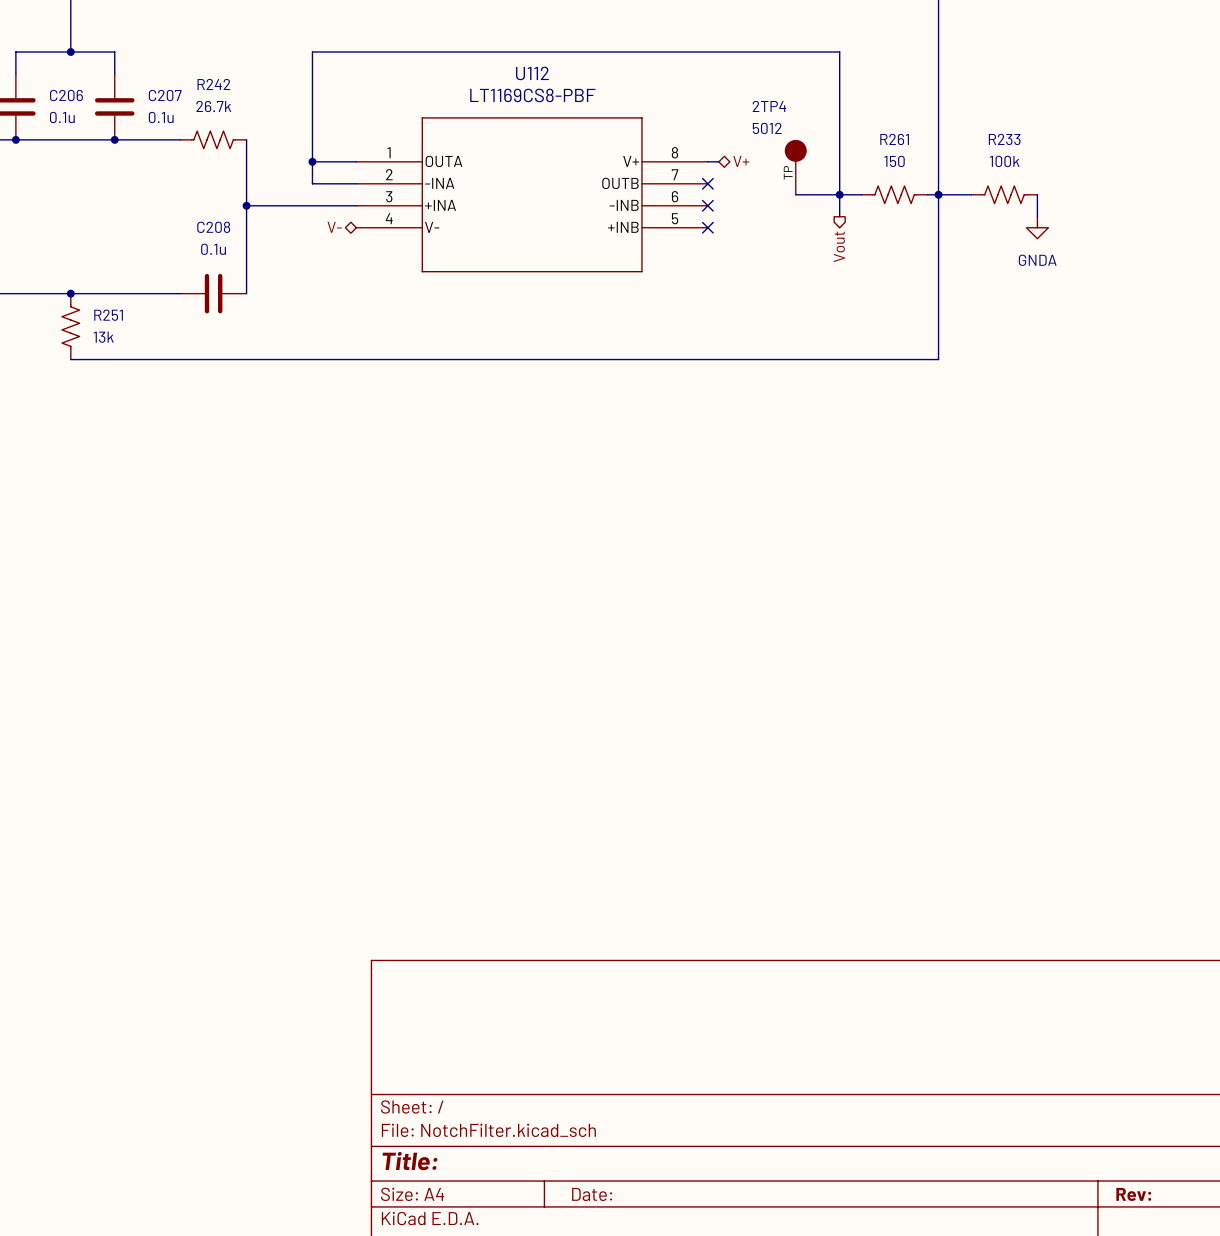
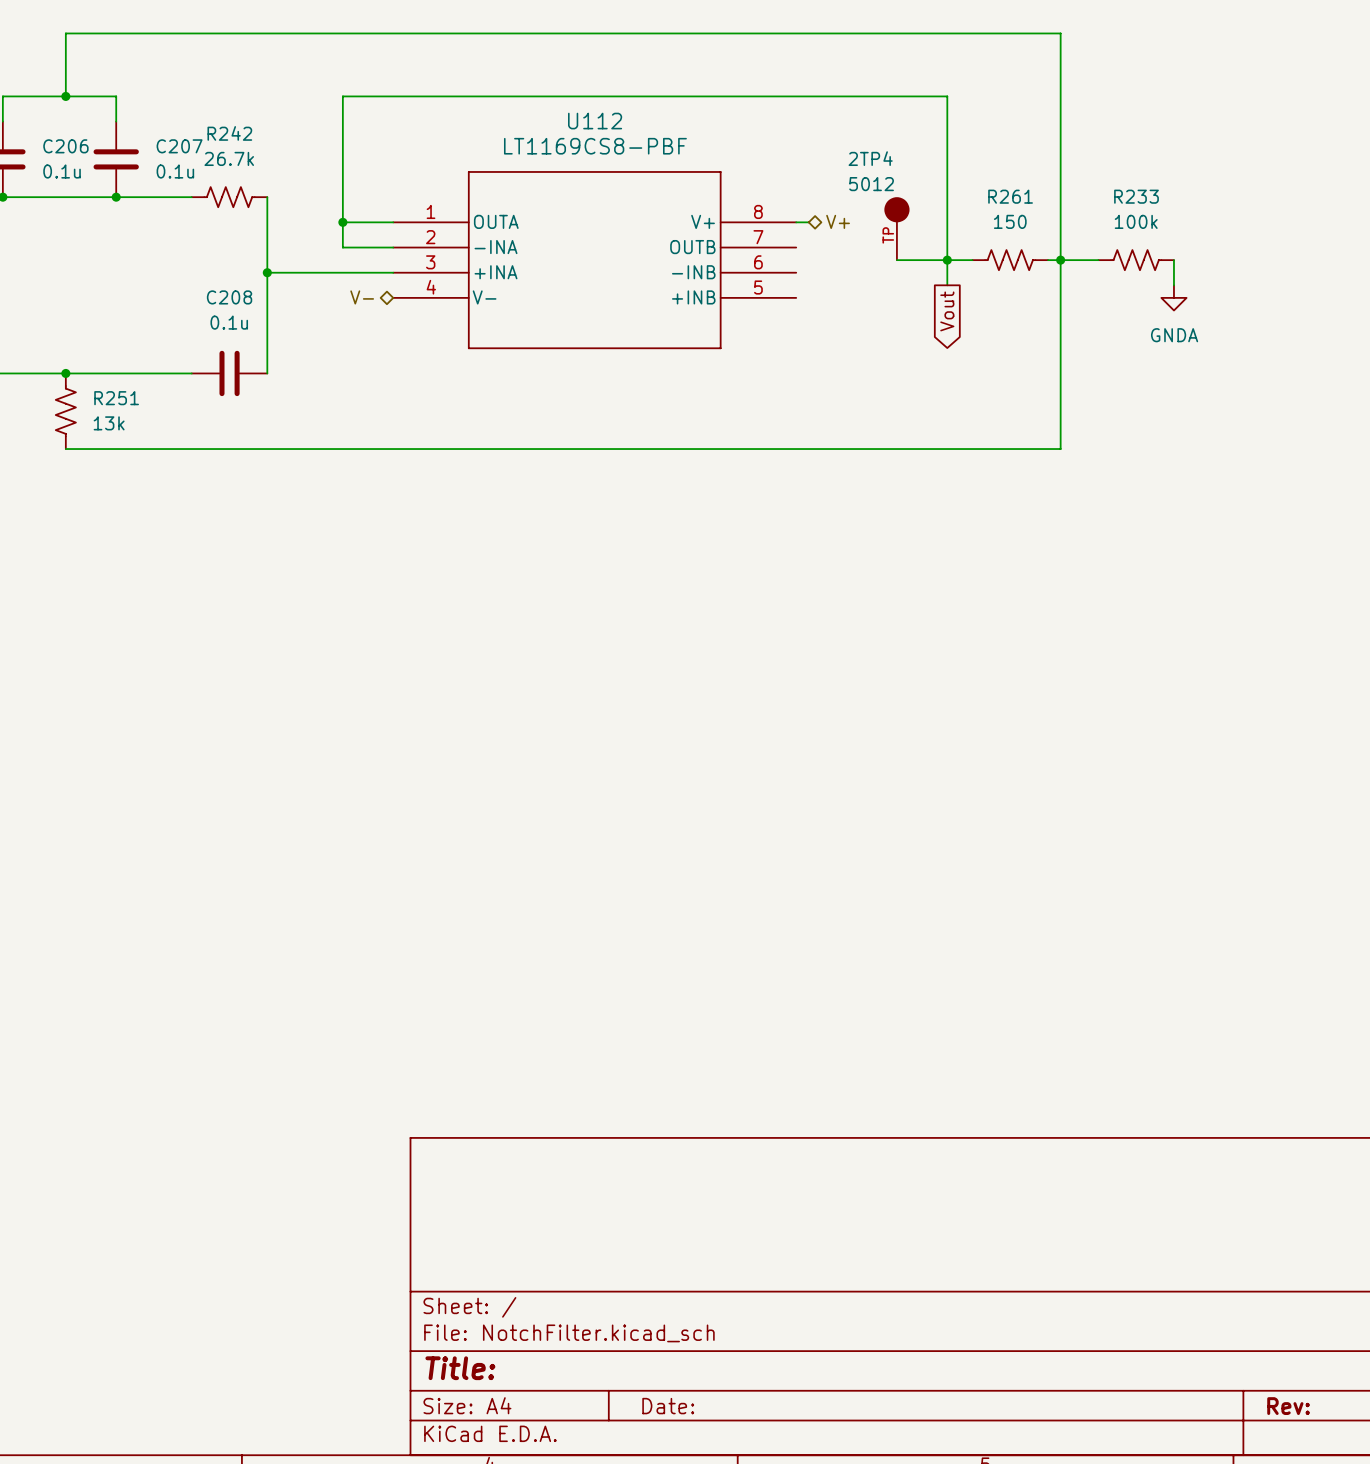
no-connect mark: (707, 183) -> none
no-connect mark: (707, 205) -> none
no-connect mark: (707, 227) -> none
global label: none -> Vout (947, 311)
hierarchical label: Vout (839, 246) -> none

